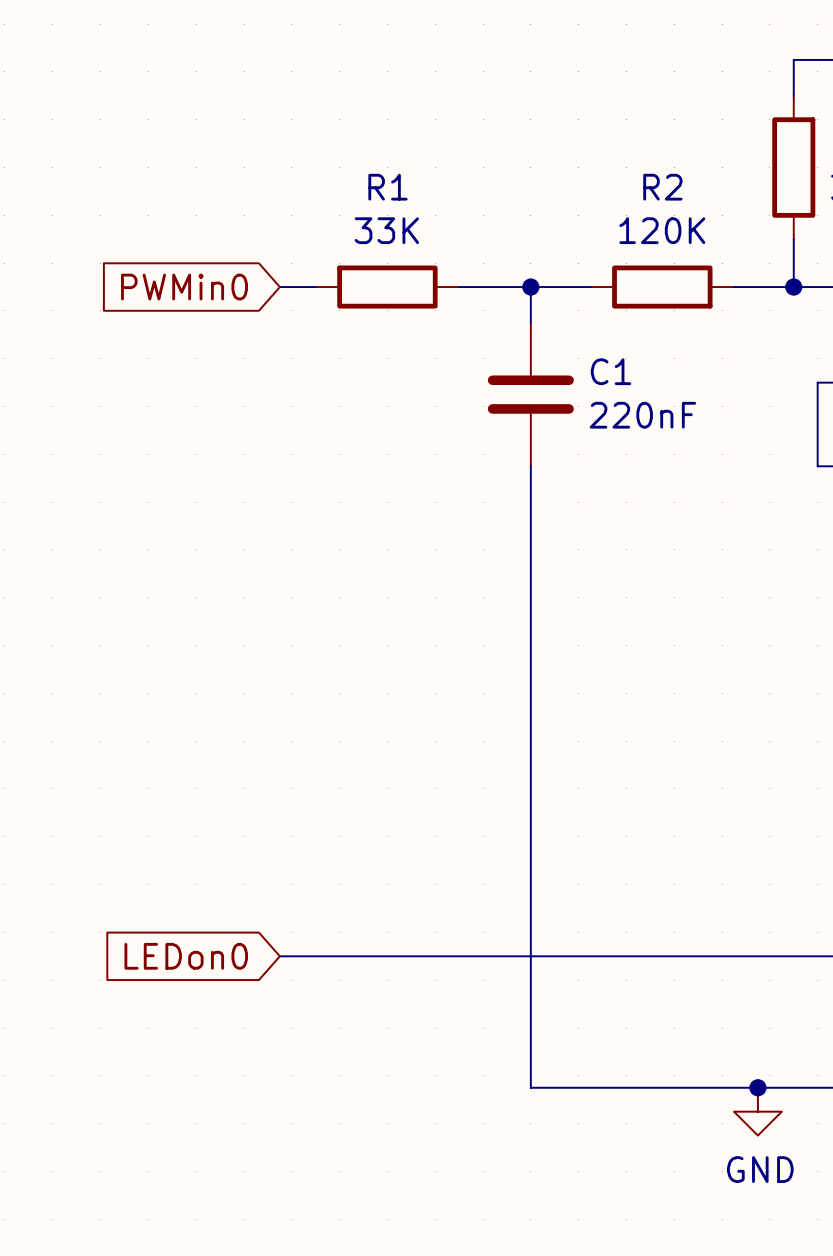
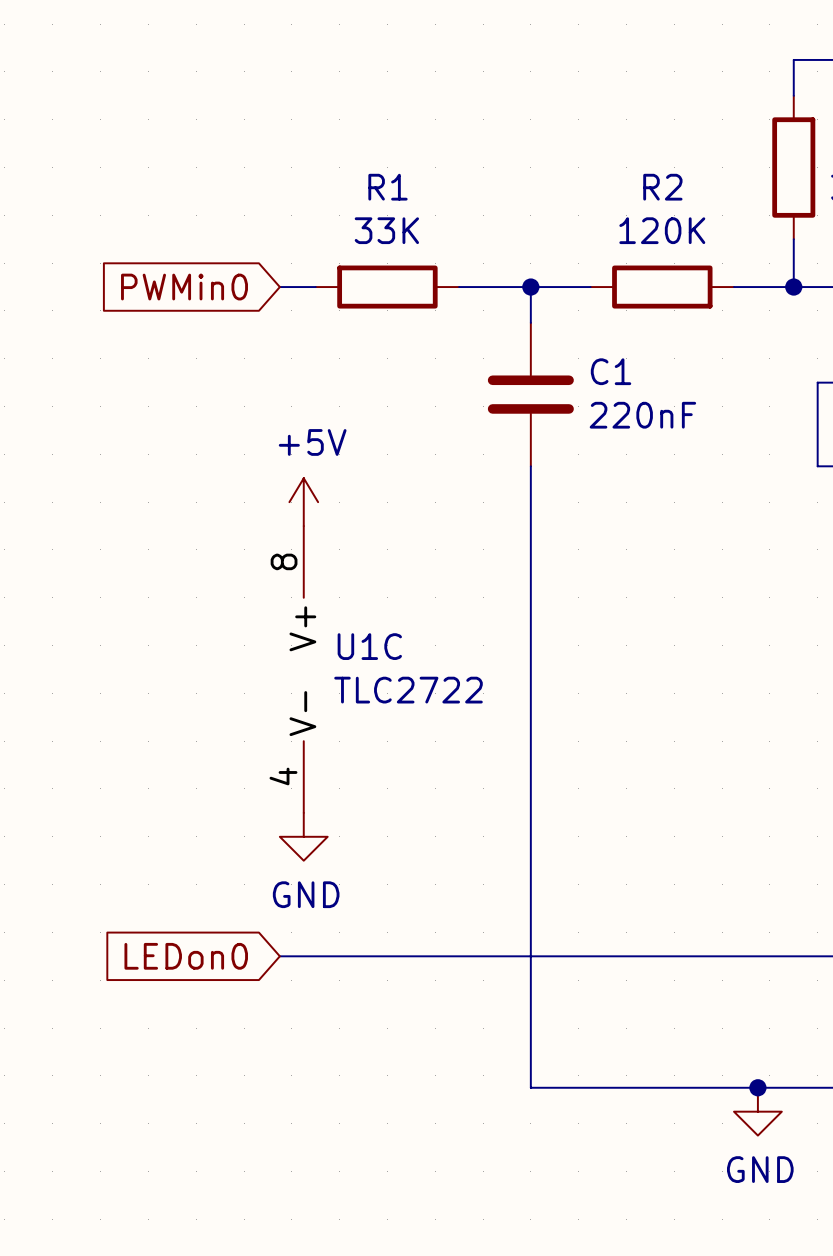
power symbol: none -> +5V (303, 502)
U1C: none -> TLC2722 (303, 669)
power symbol: none -> GND (303, 836)

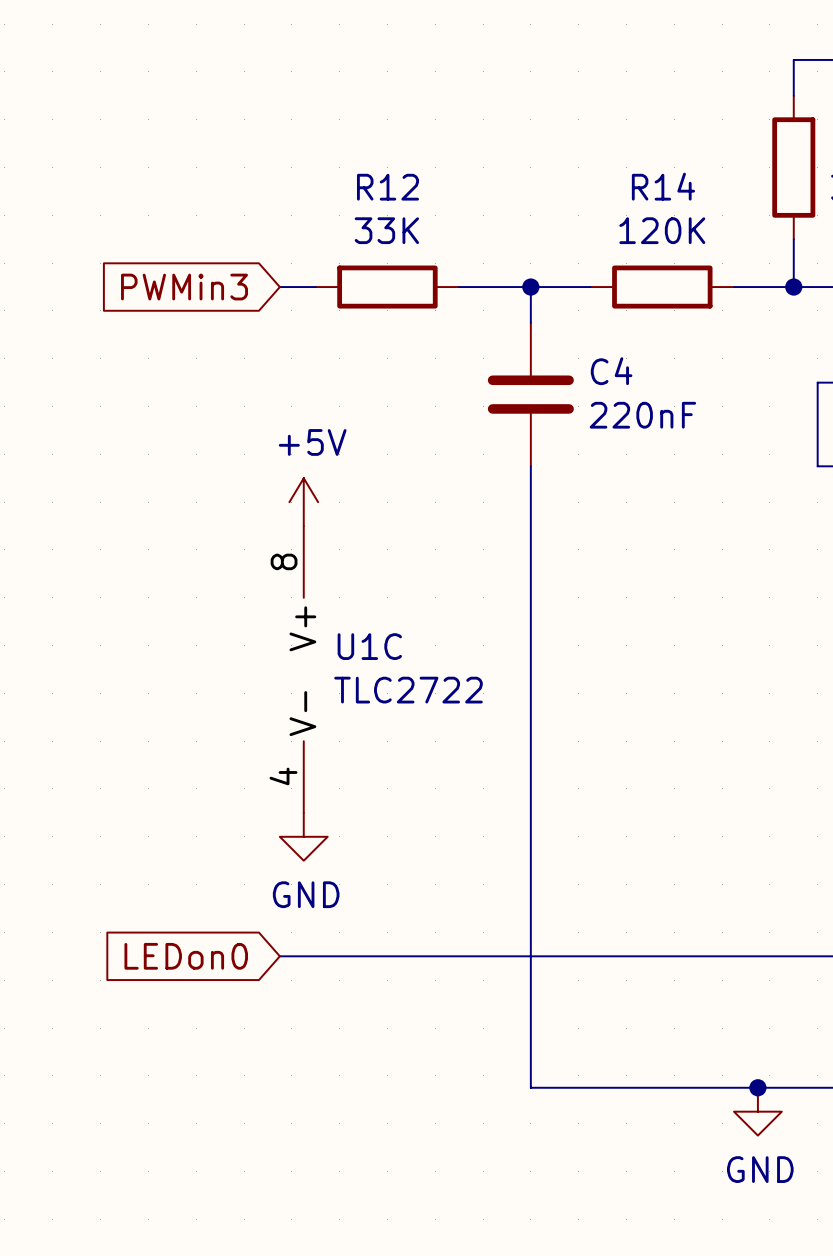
R1 name: R1 (388, 187) -> R12 (388, 187)
R2 name: R2 (662, 187) -> R14 (663, 186)
global label: PWMin0 (184, 287) -> PWMin3 (184, 287)
C1 name: C1 (611, 371) -> C4 (611, 371)

